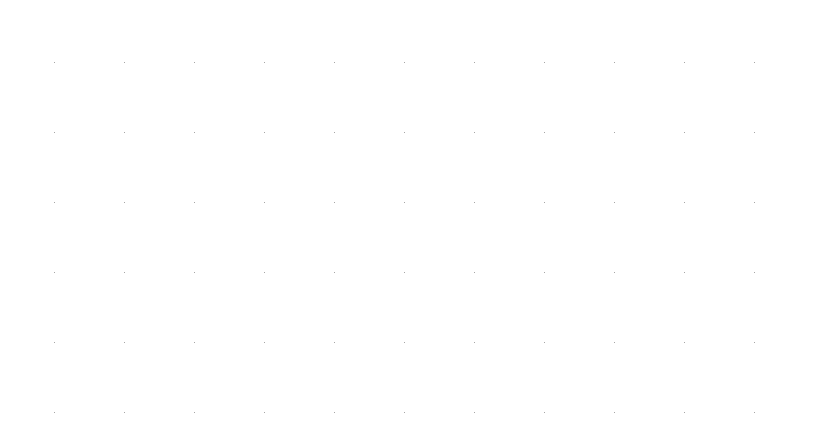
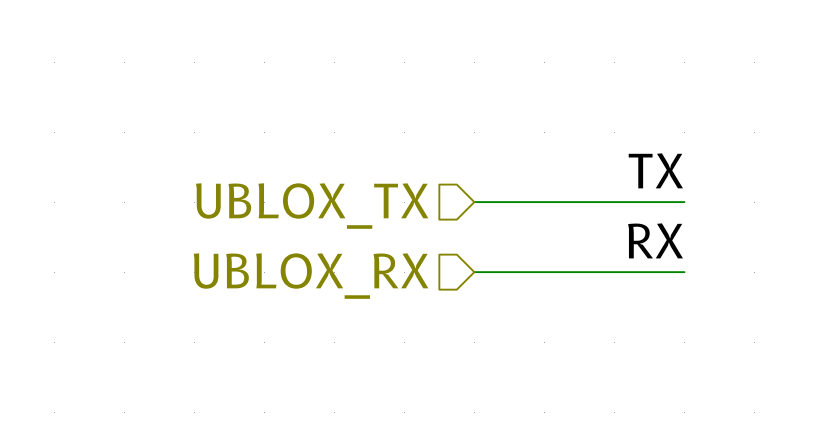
label: none -> TX (655, 170)
wire: none -> (474, 202) (684, 202)
hierarchical label: none -> UBLOX_TX (312, 206)
label: none -> RX (655, 240)
wire: none -> (474, 272) (684, 272)
hierarchical label: none -> UBLOX_RX (311, 276)

